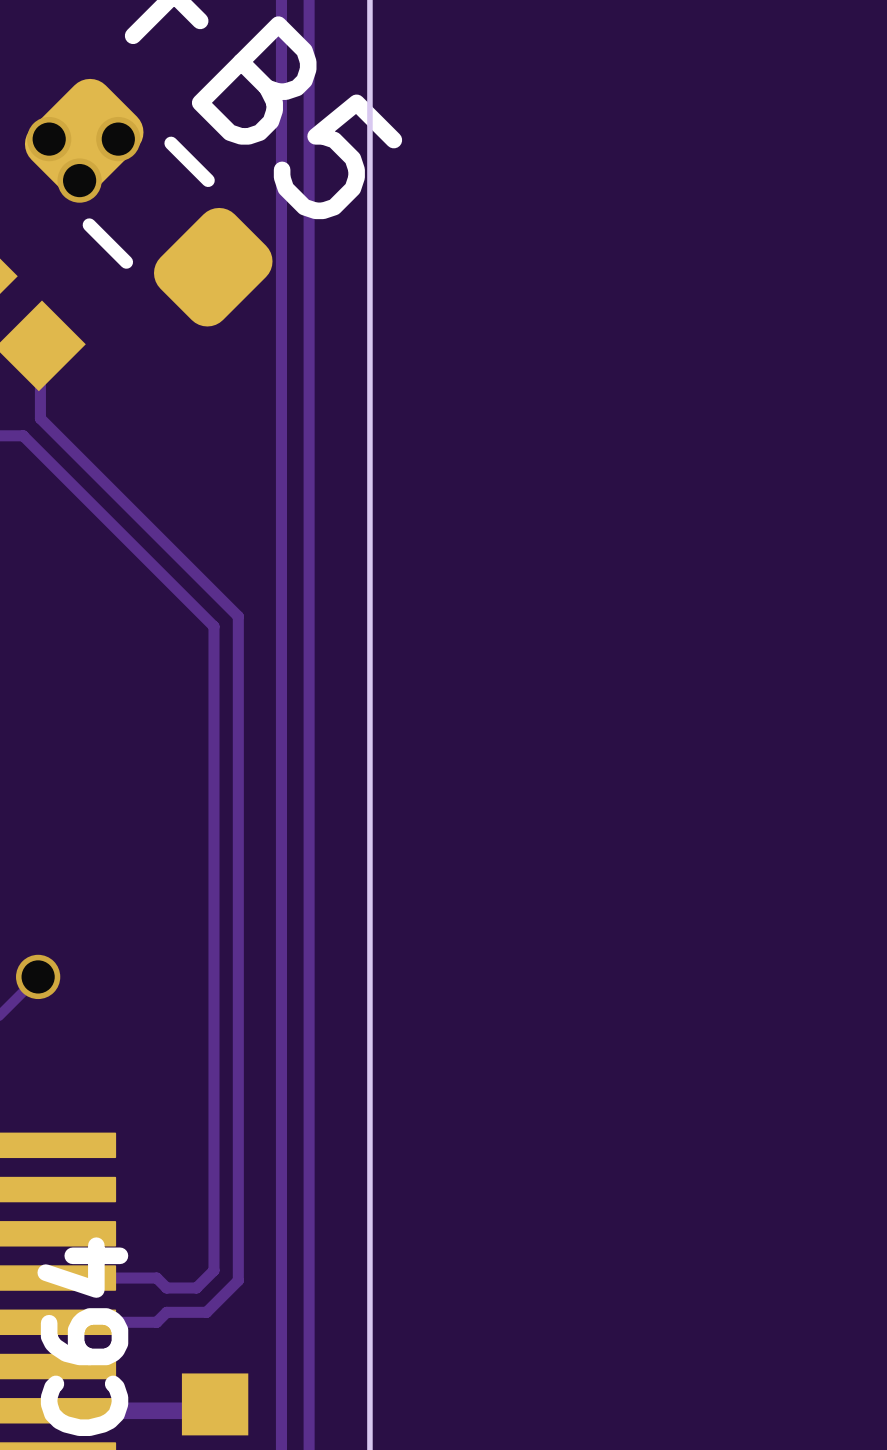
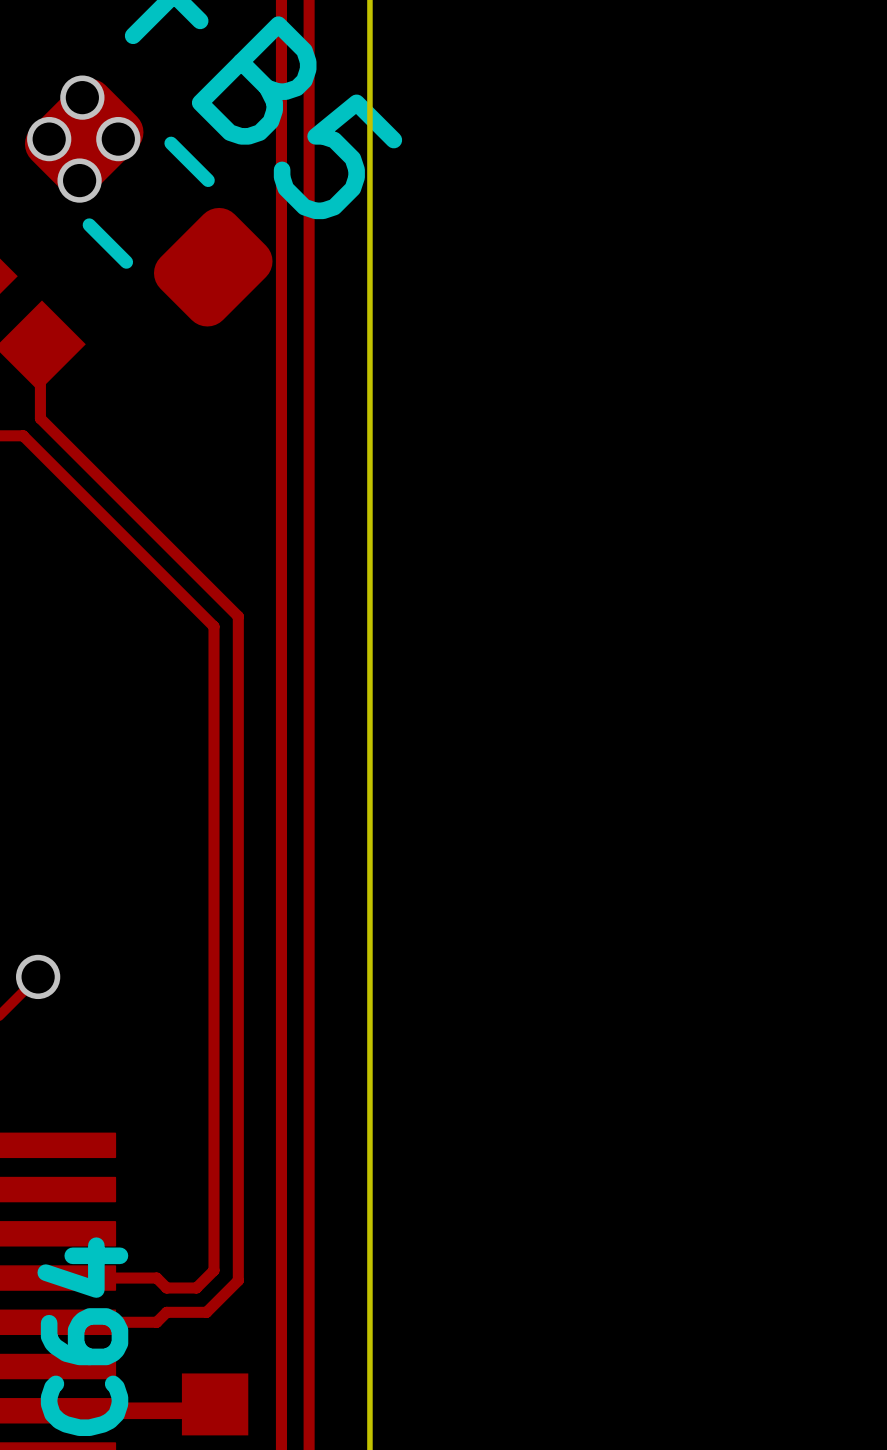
via: none -> (82, 97)

